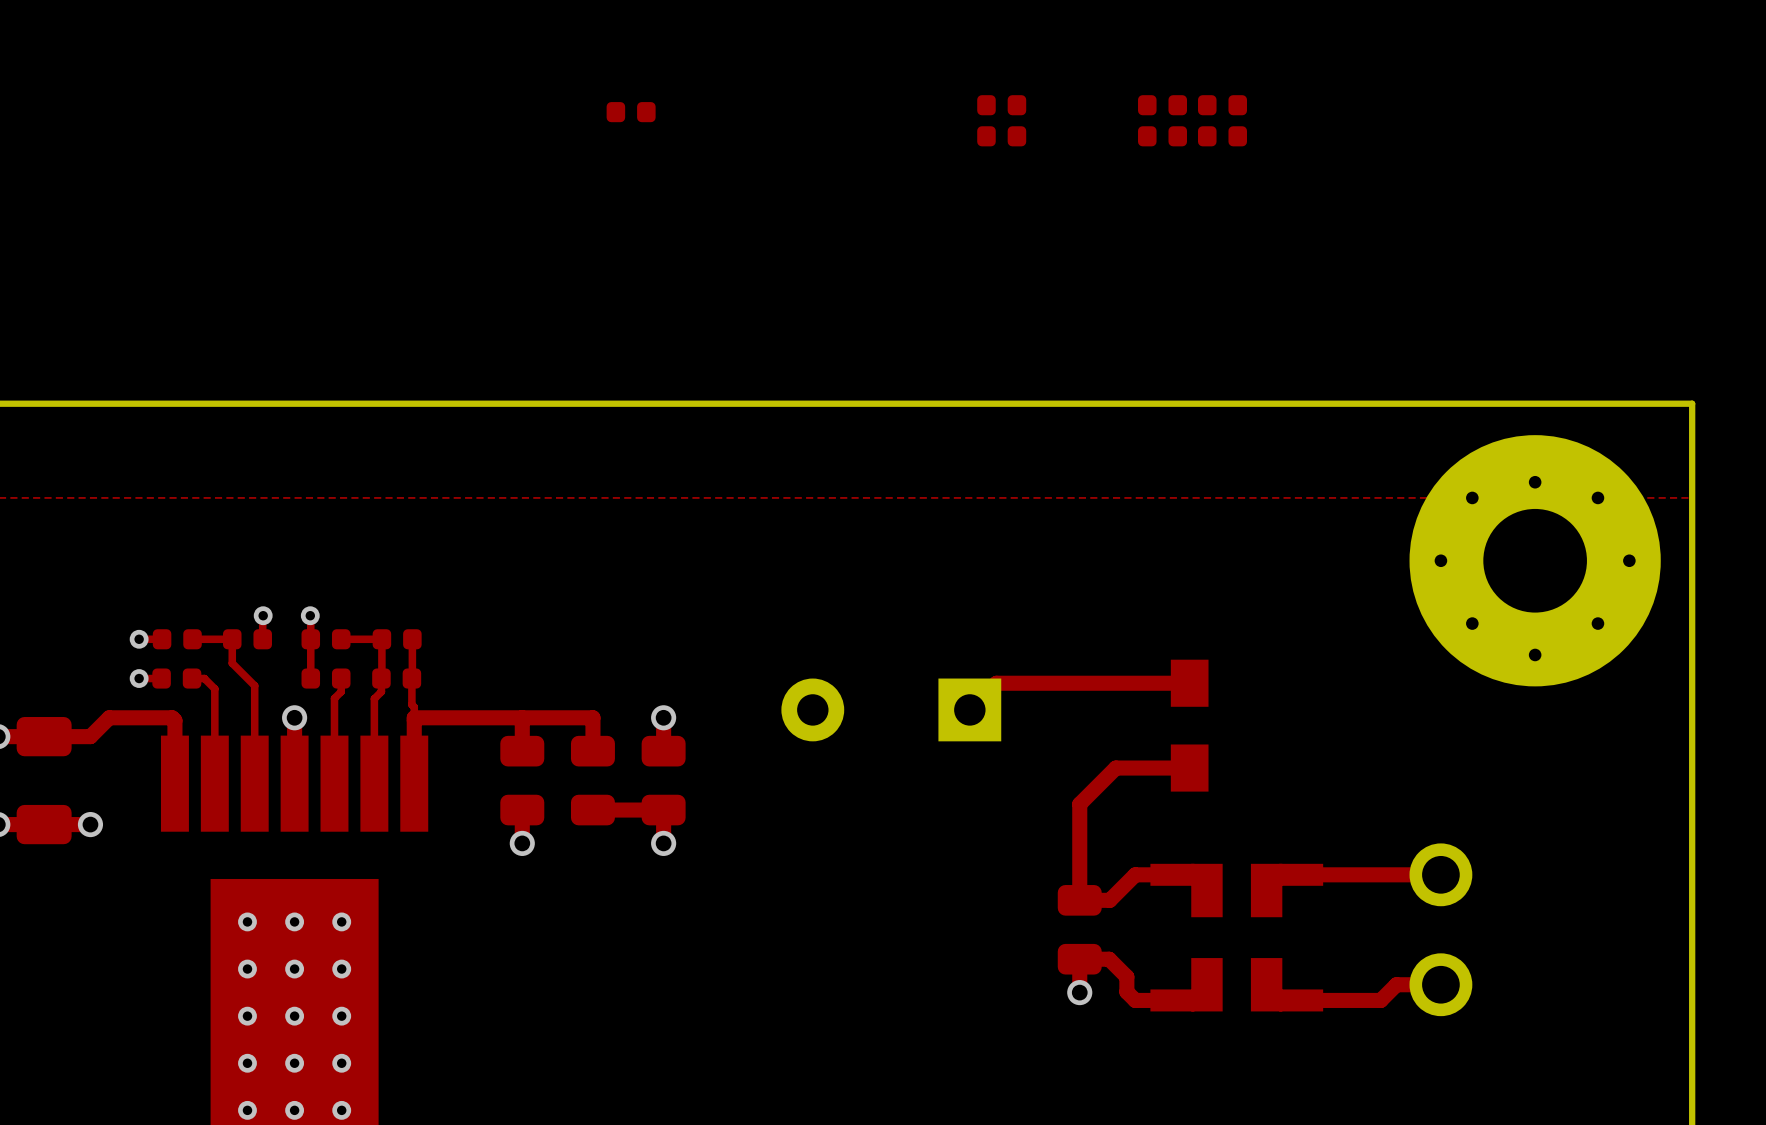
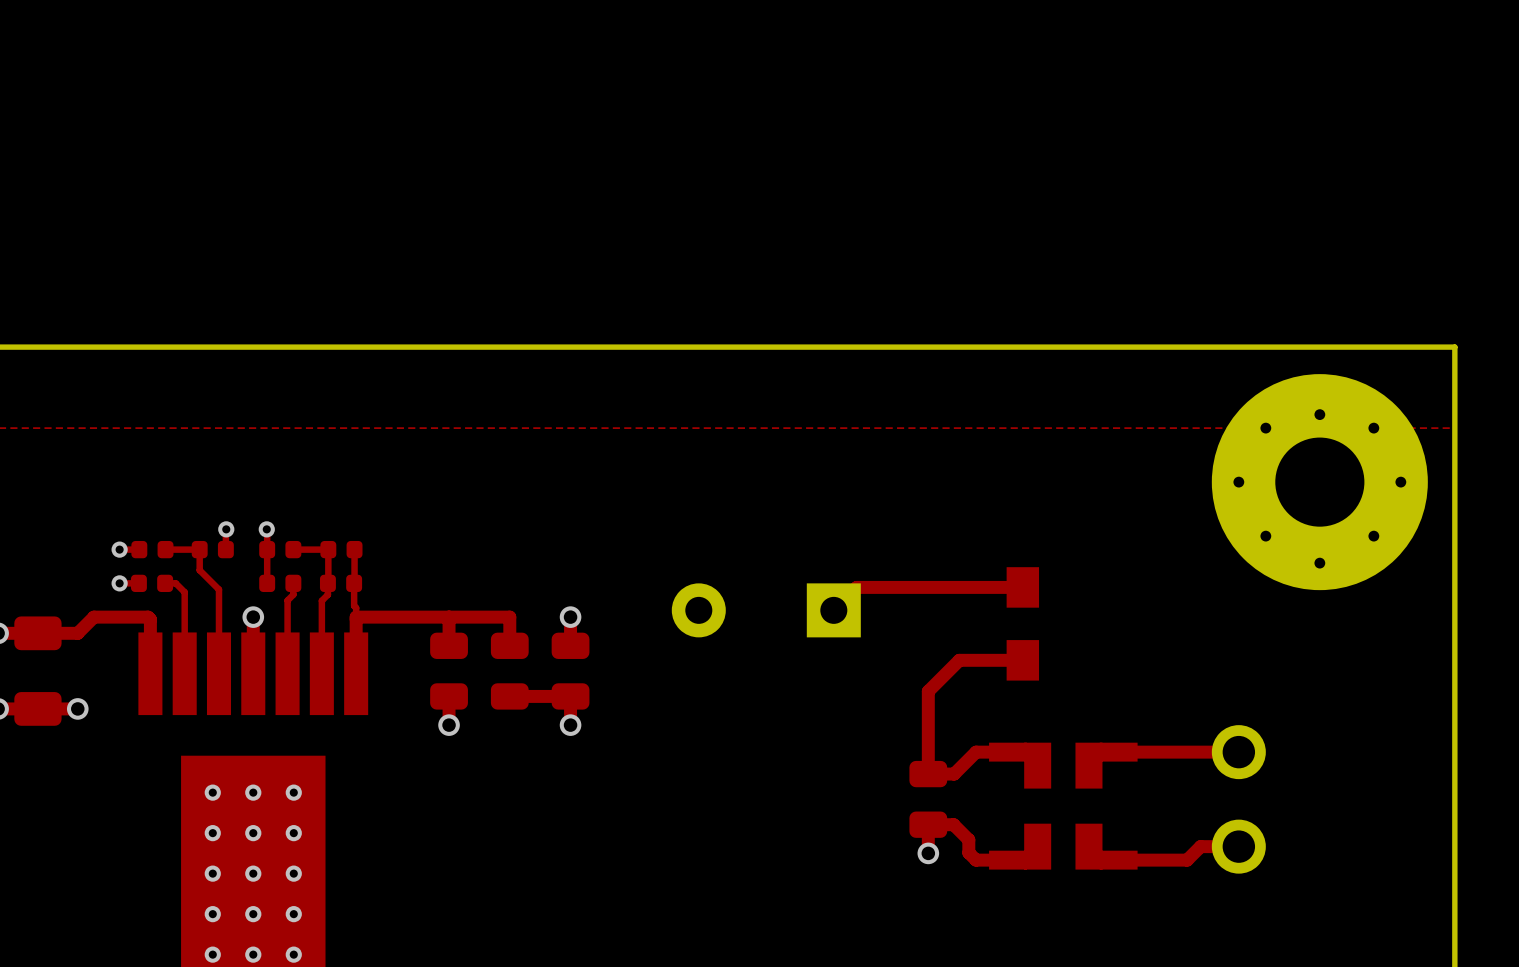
part: (1001, 105) -> none
part: (1162, 105) -> none
part: (1222, 105) -> none
part: (631, 112) -> none
part: (1001, 136) -> none
part: (1162, 136) -> none
part: (1222, 136) -> none

